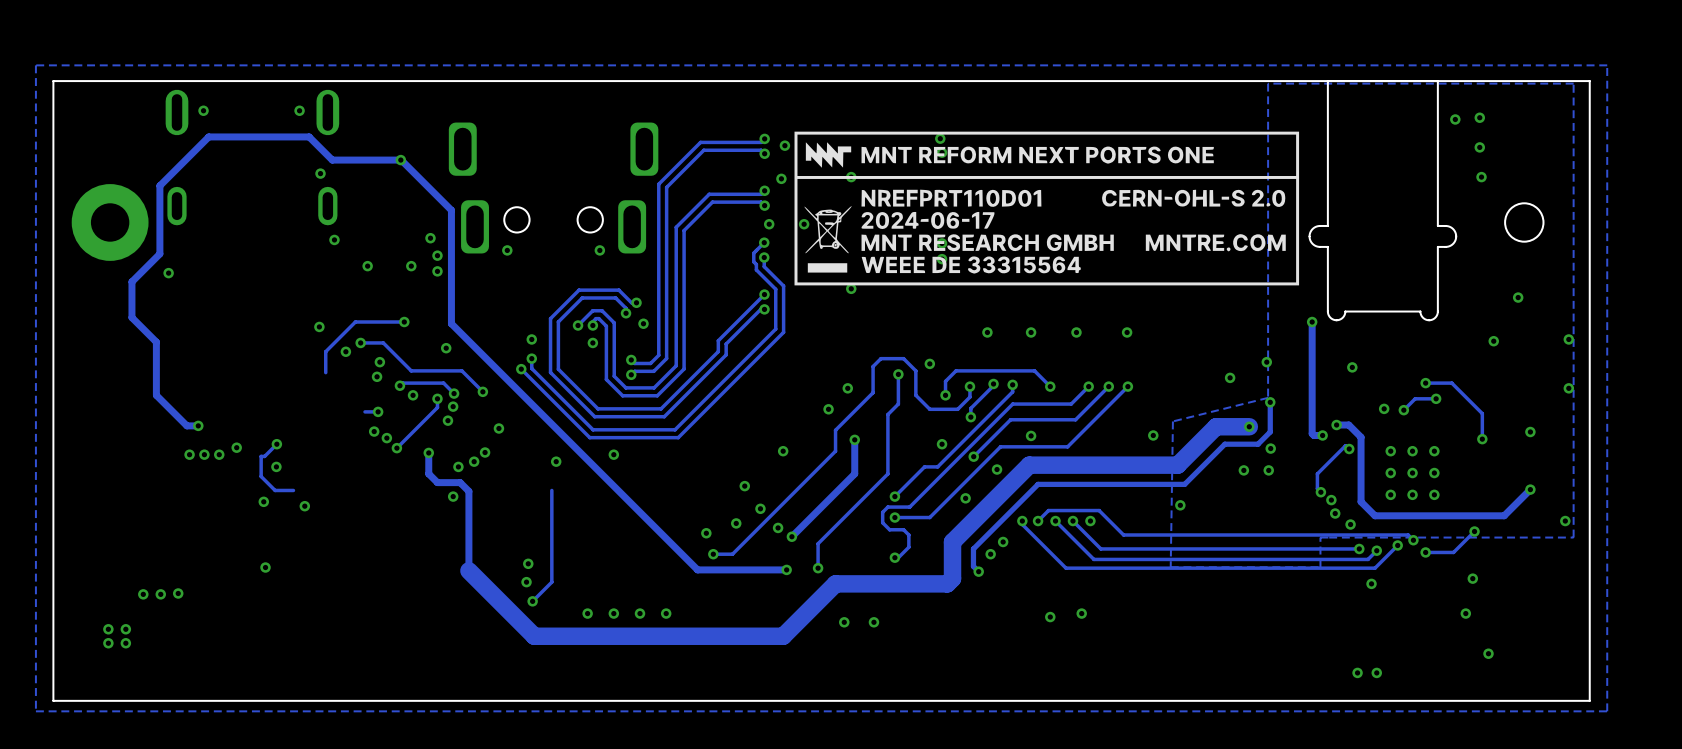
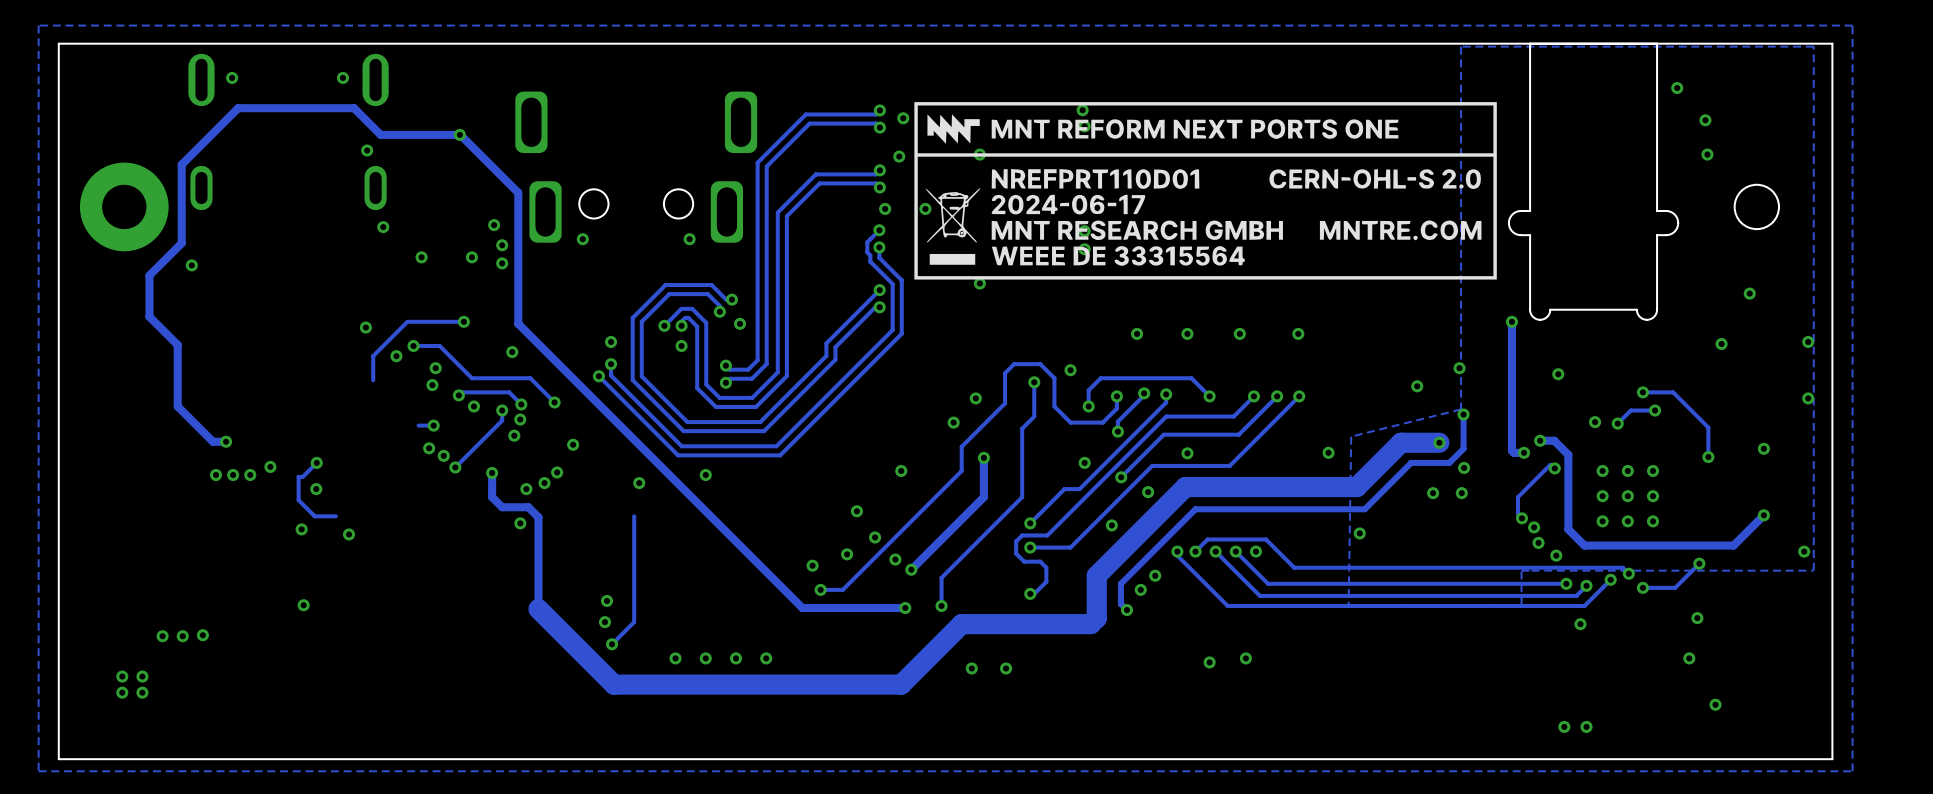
via: (1479, 117) -> none

